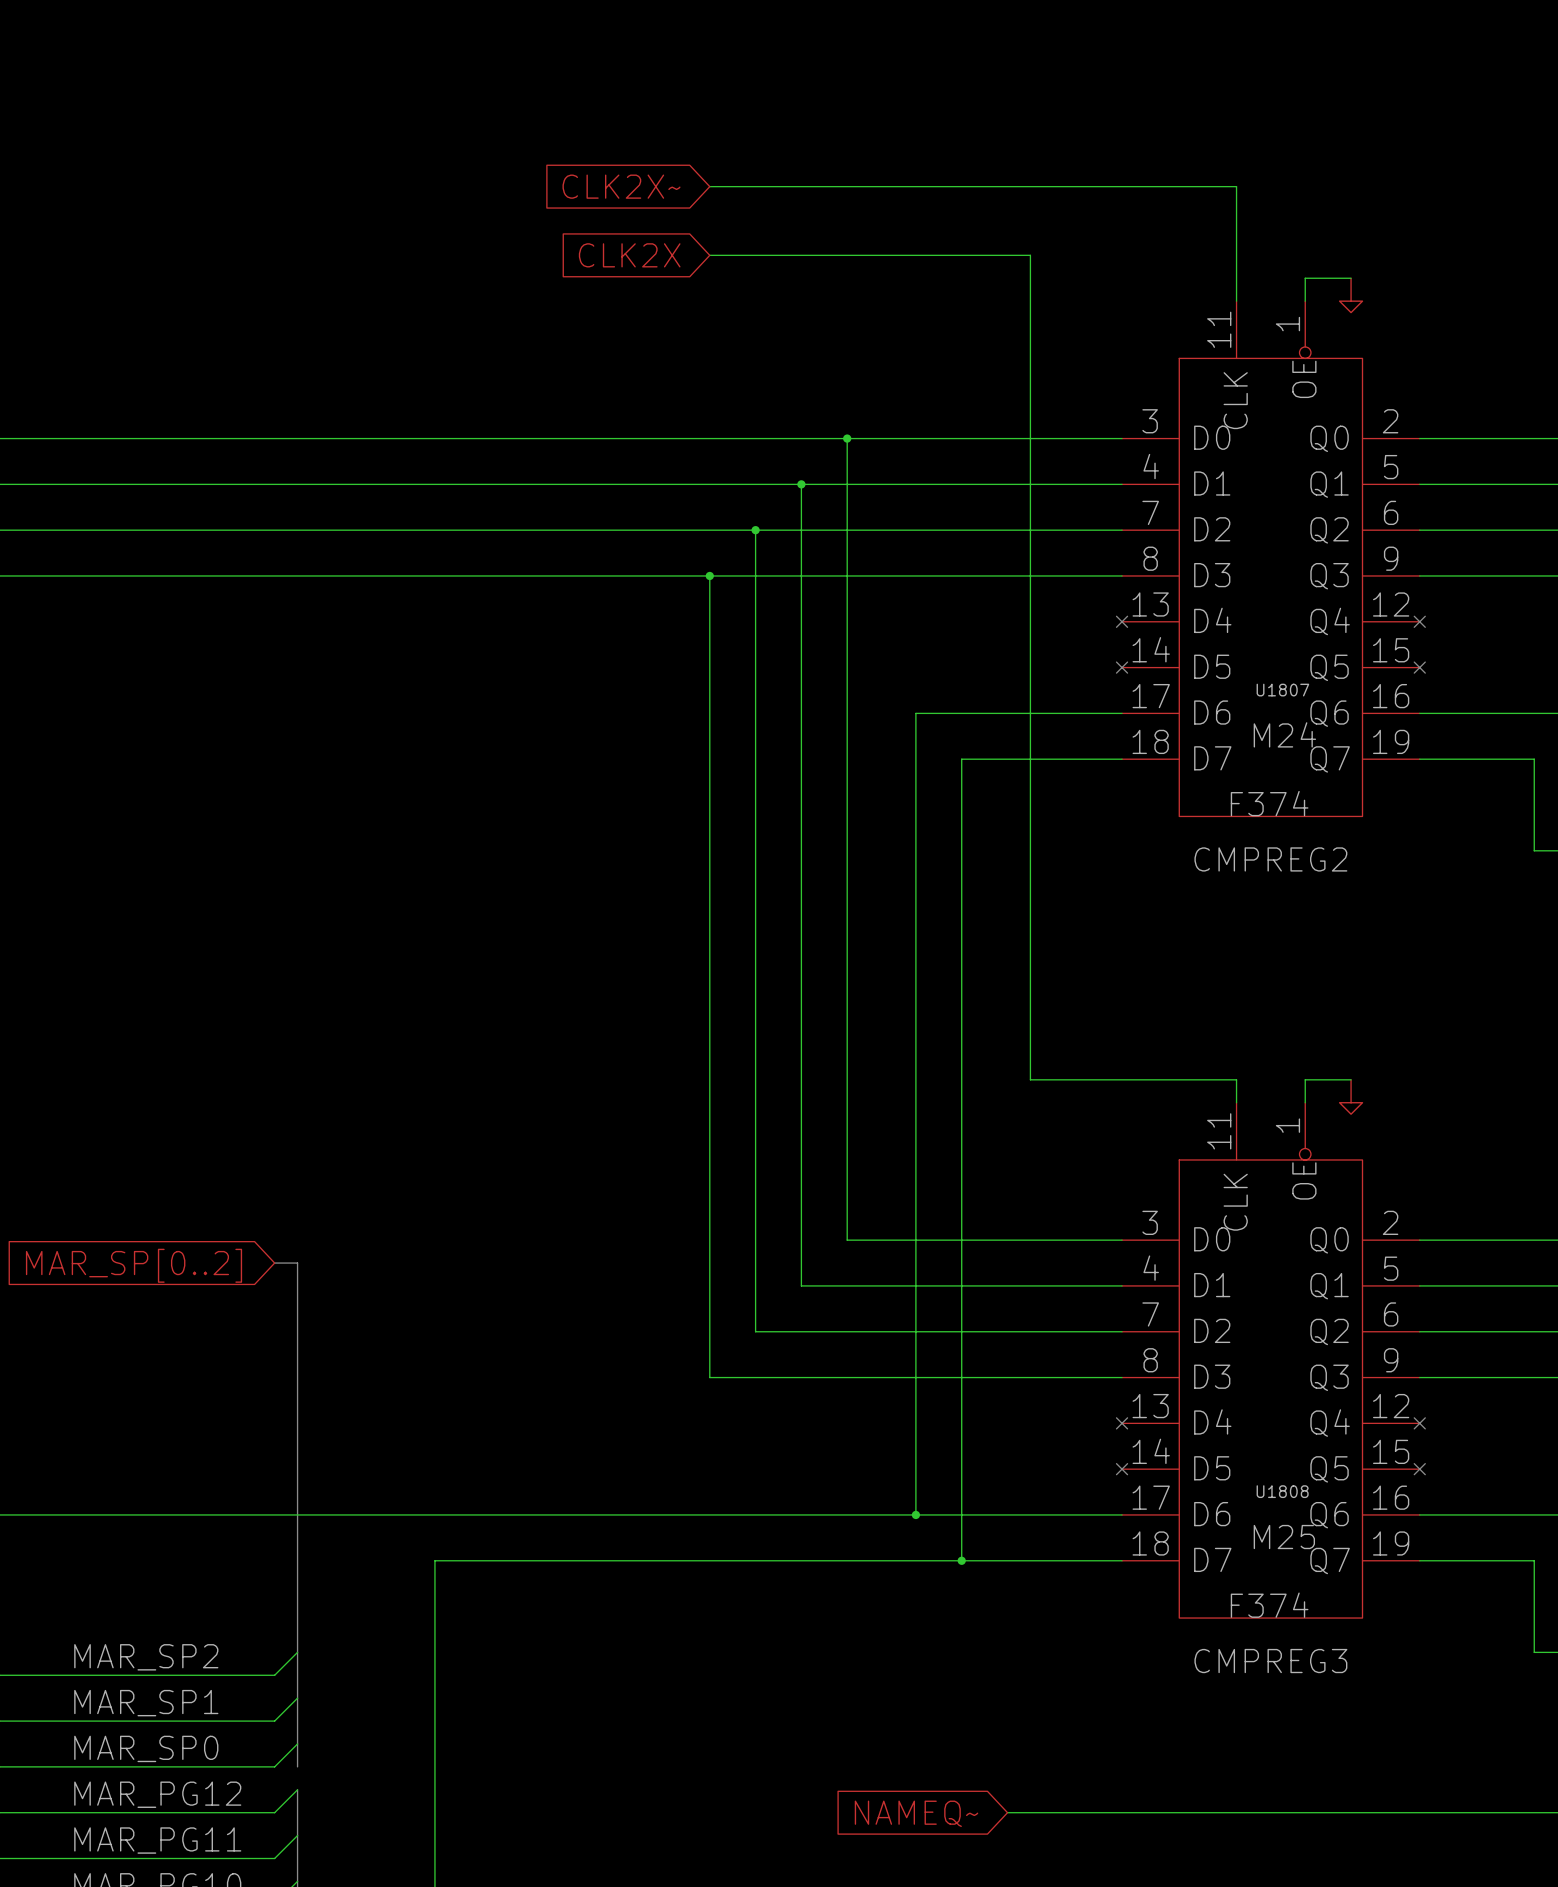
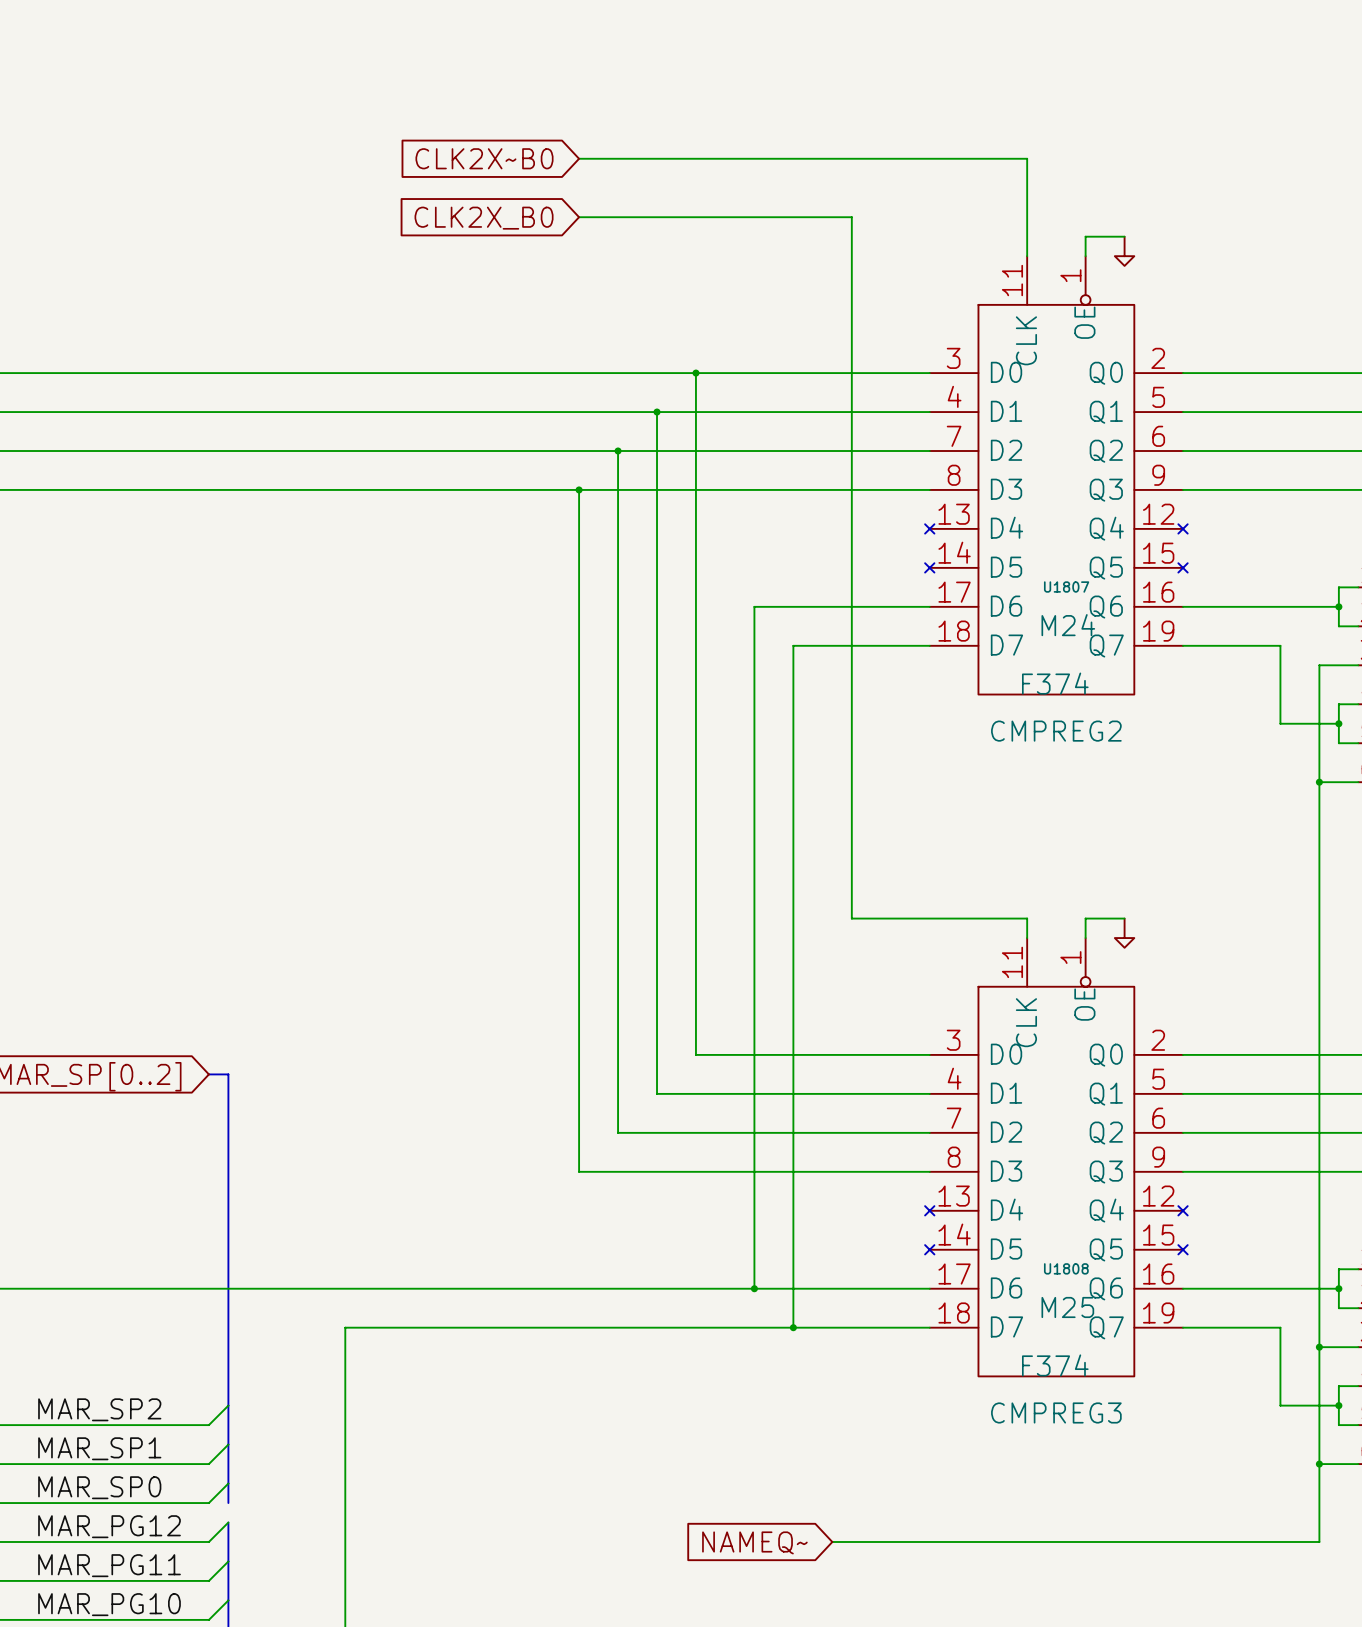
global label: CLK2X~ (621, 186) -> CLK2X~B0 (484, 158)
global label: CLK2X (629, 255) -> CLK2X_B0 (484, 218)

